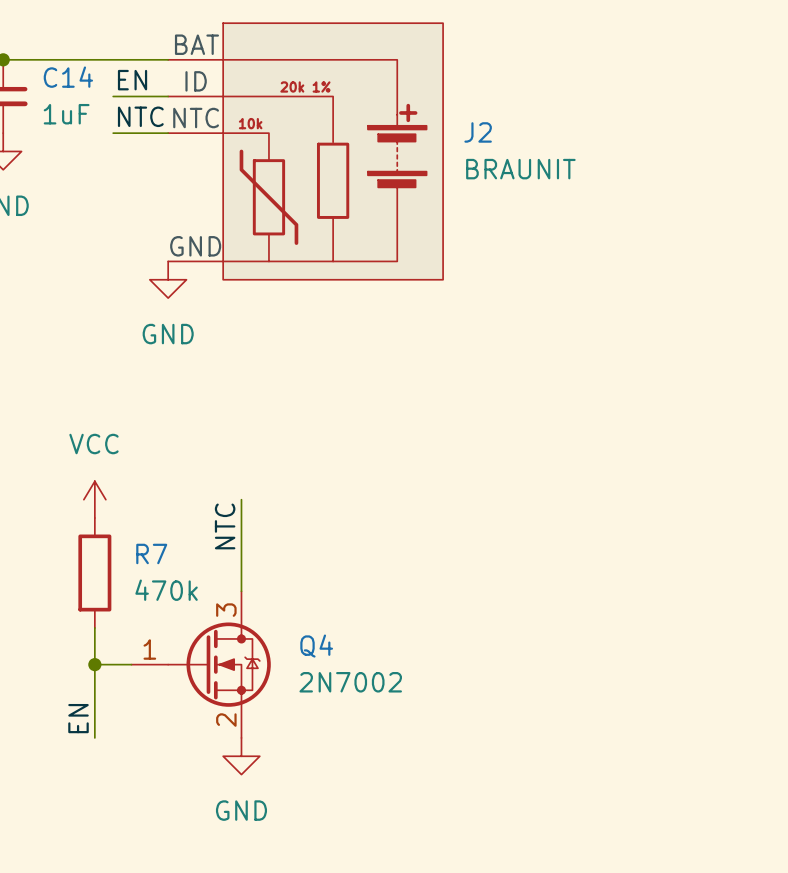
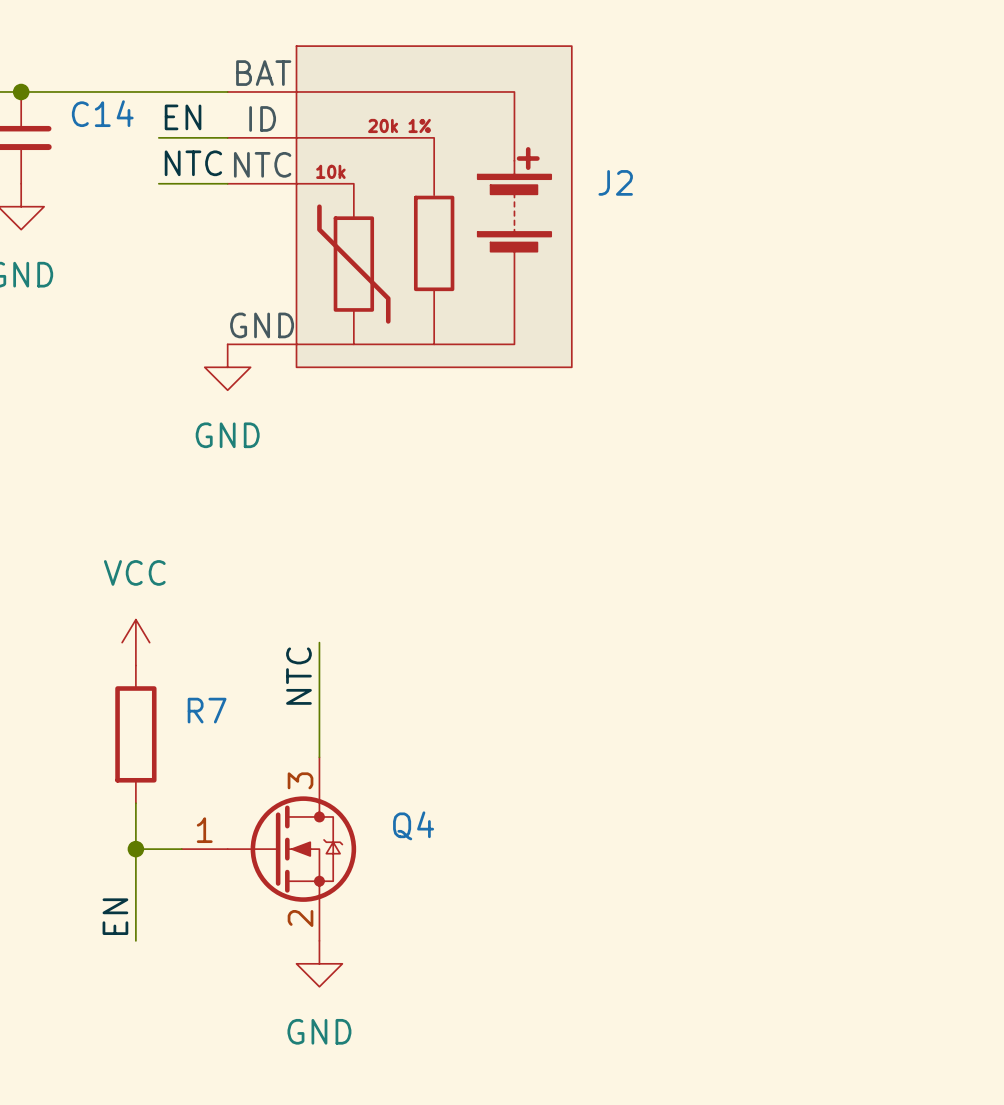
C14 value: 1uF (66, 114) -> none
J2 value: BRAUNIT (520, 169) -> none
R7 value: 470k (166, 590) -> none
Q4 value: 2N7002 (350, 682) -> none

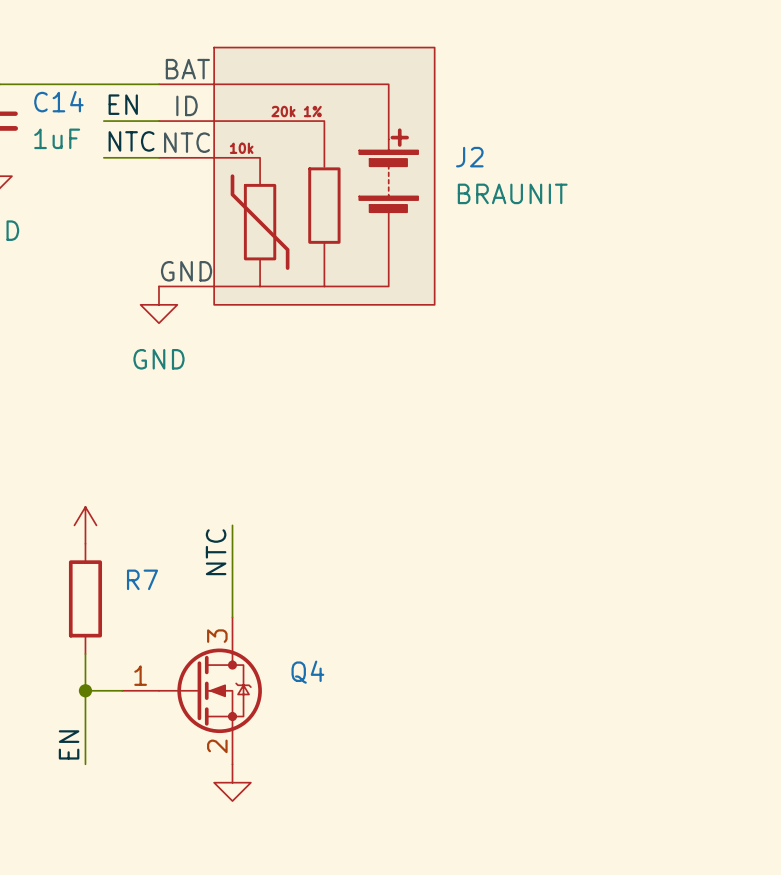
C14 value: none -> 1uF (57, 138)
J2 value: none -> BRAUNIT (512, 193)
power symbol text: VCC (134, 572) -> none
power symbol text: GND (319, 1031) -> none

